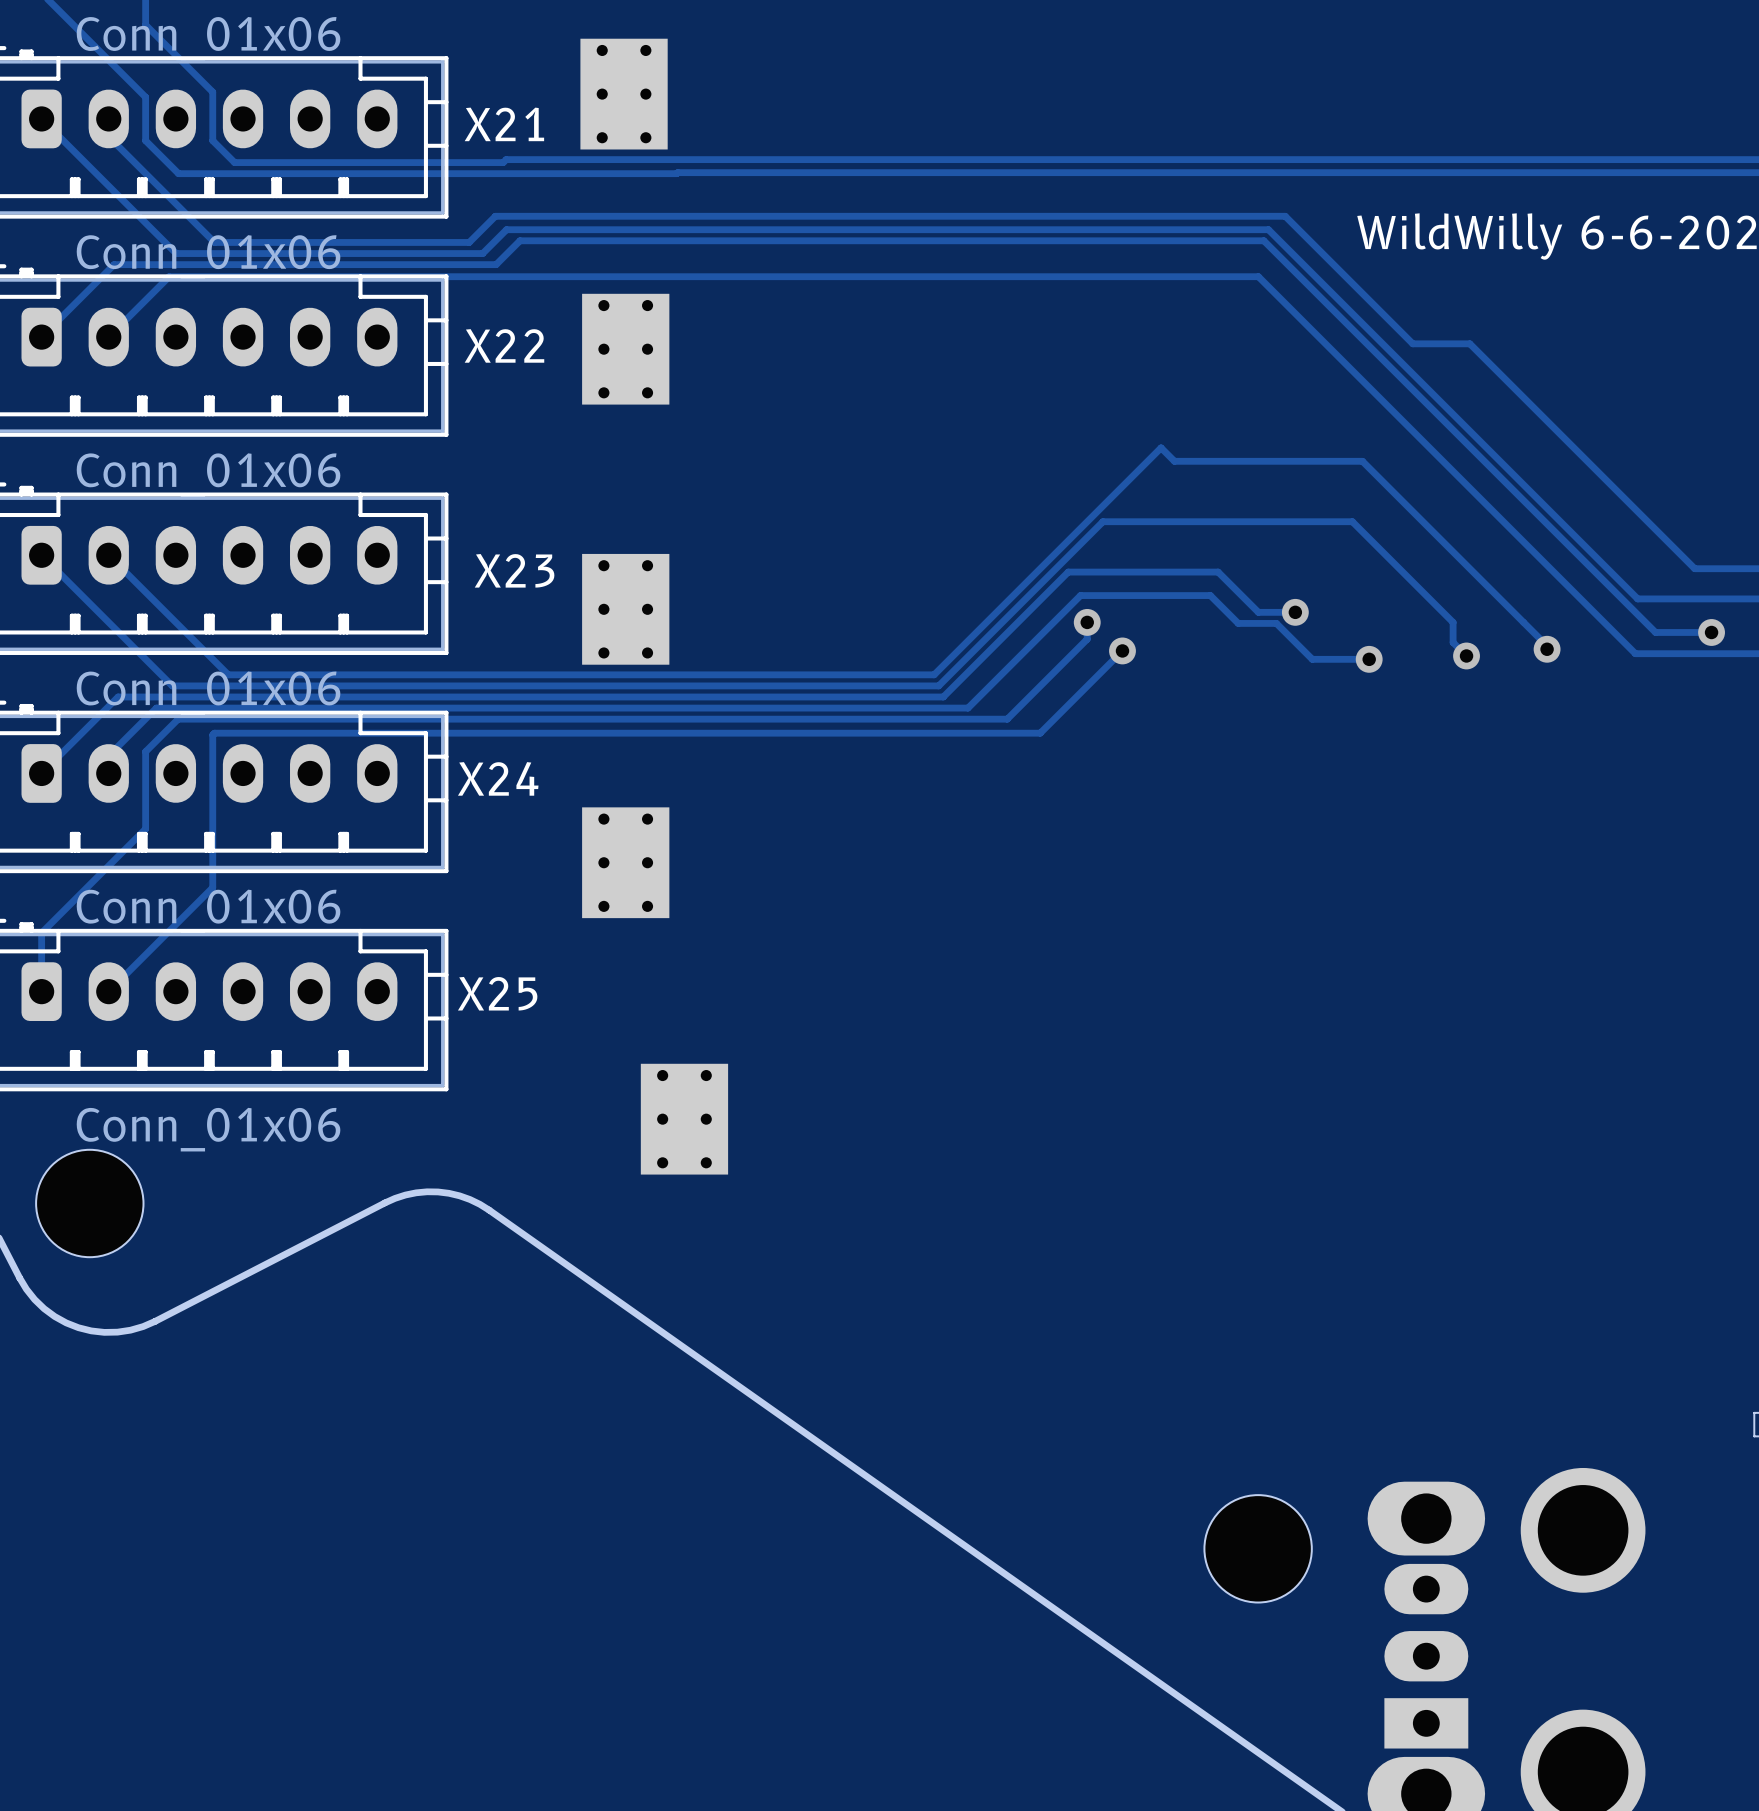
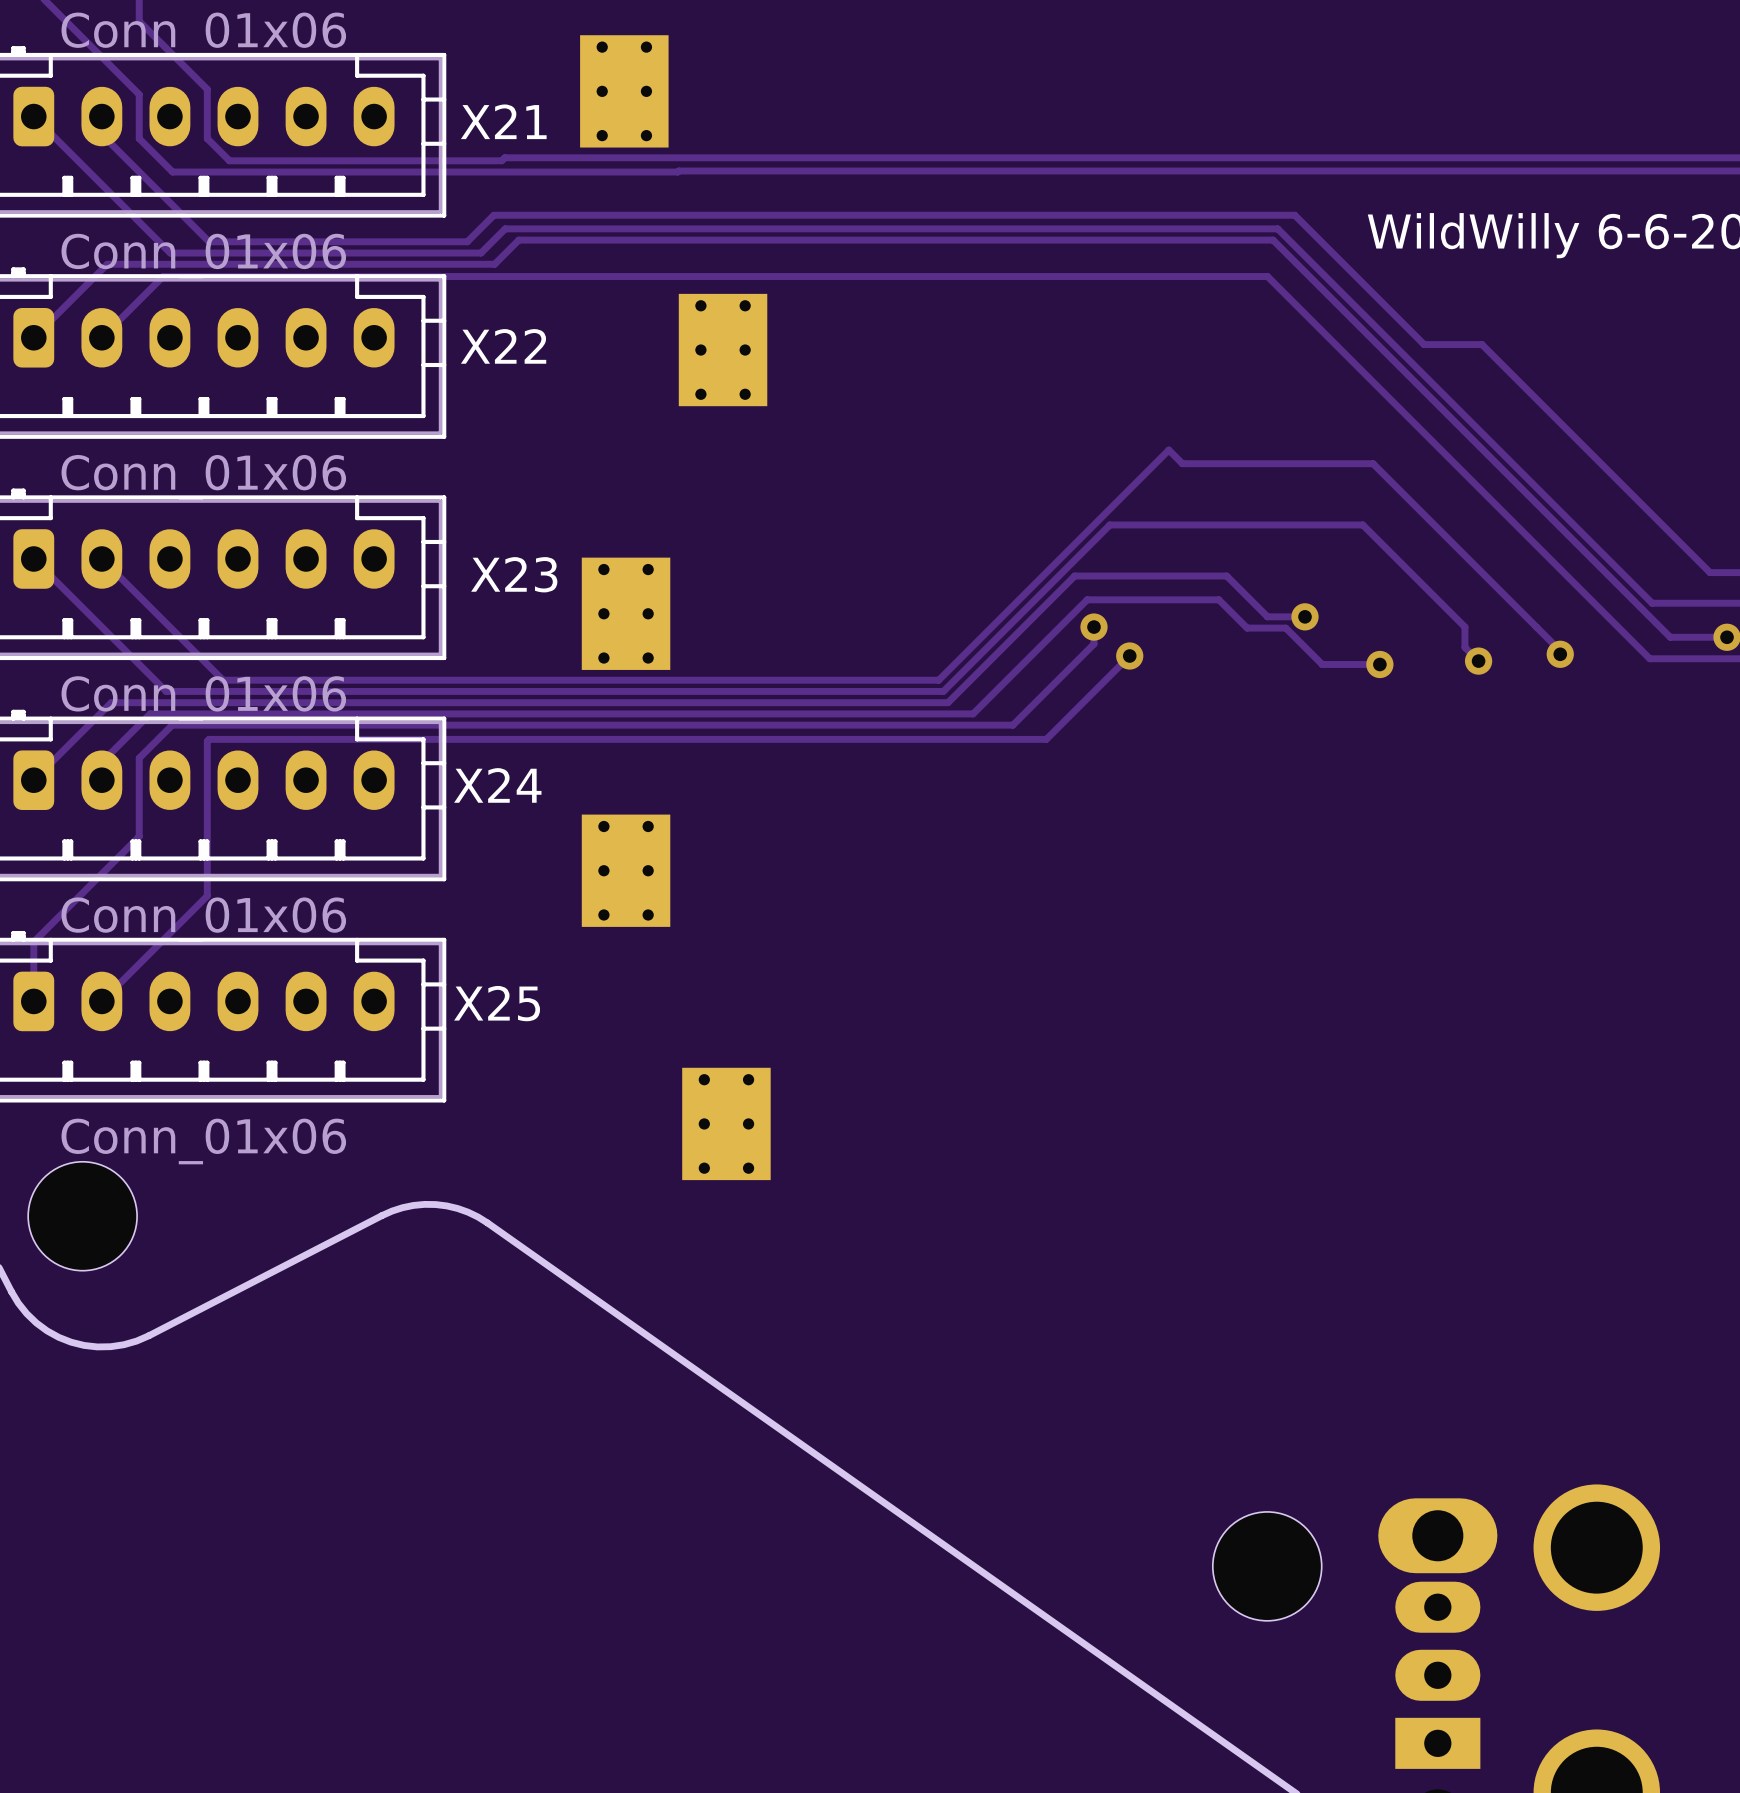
part position: (625, 349) -> (723, 350)
part position: (684, 1119) -> (726, 1123)

